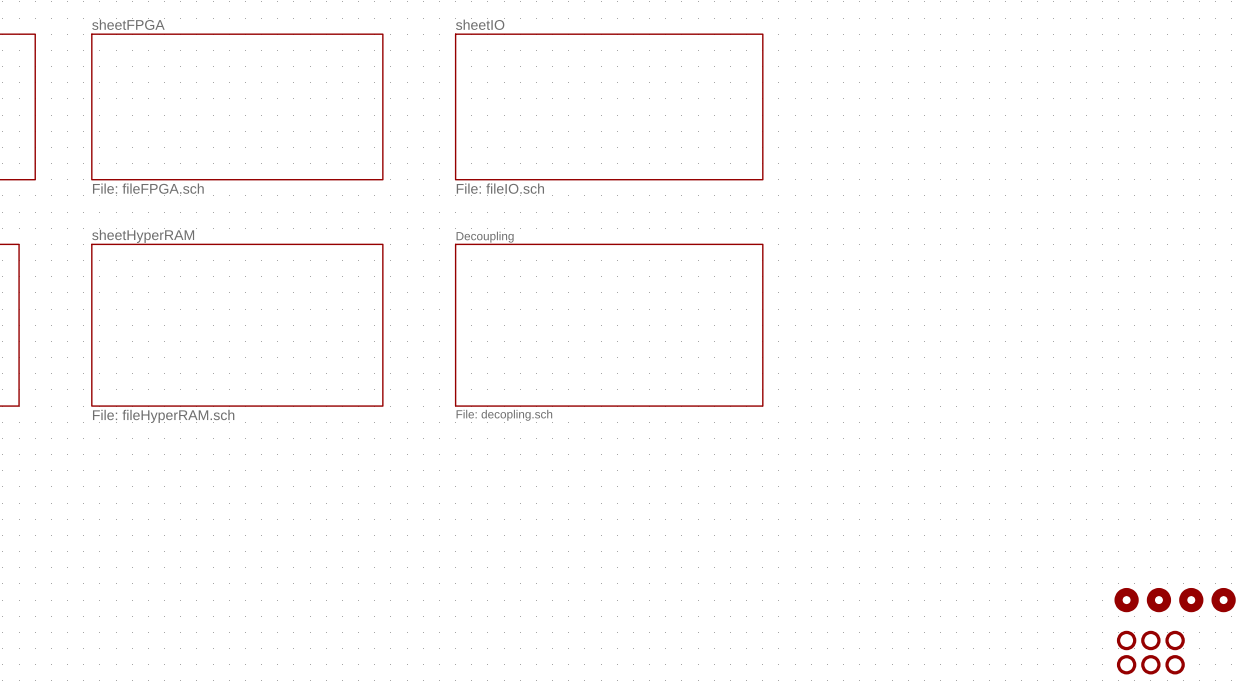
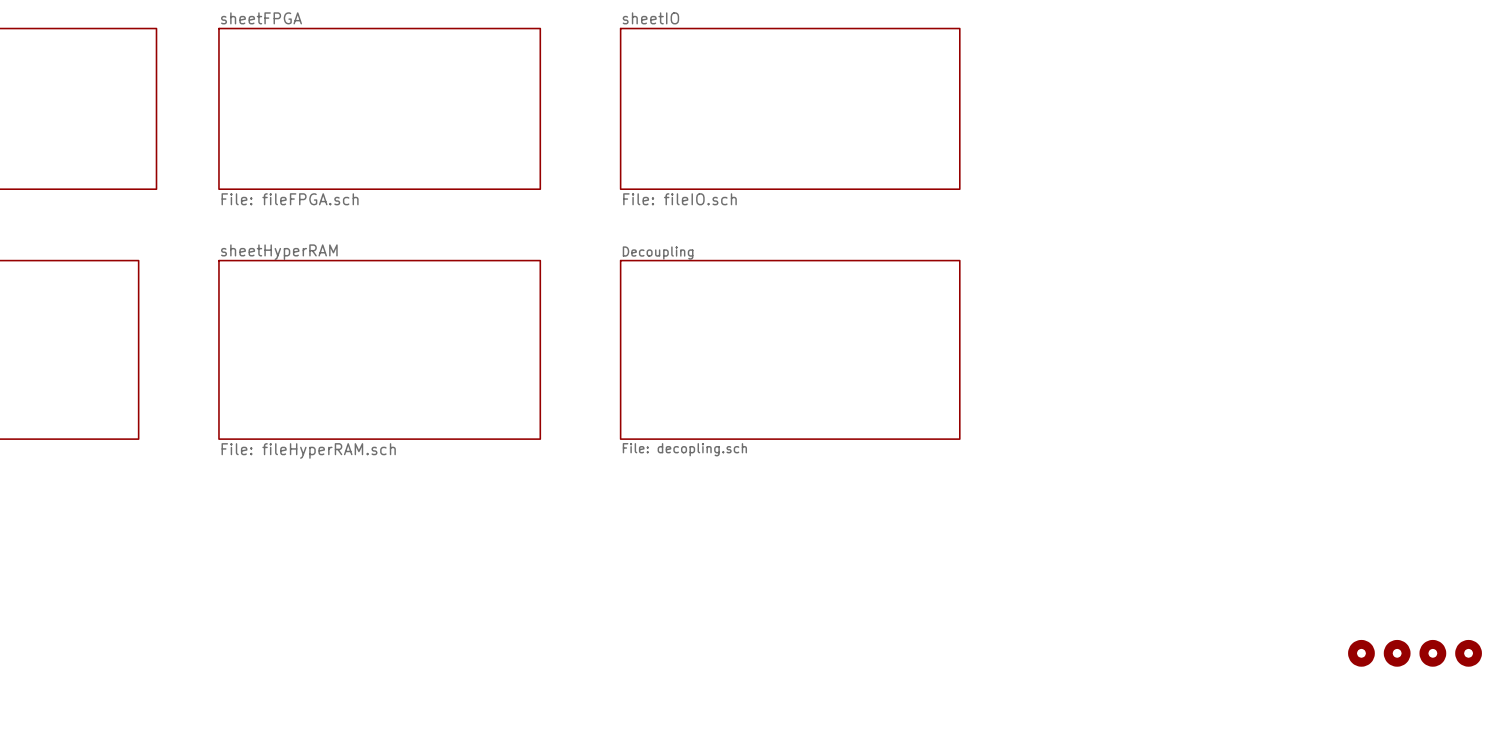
part: (1126, 640) -> none
part: (1150, 640) -> none
part: (1175, 640) -> none
part: (1126, 664) -> none
part: (1150, 664) -> none
part: (1175, 664) -> none

